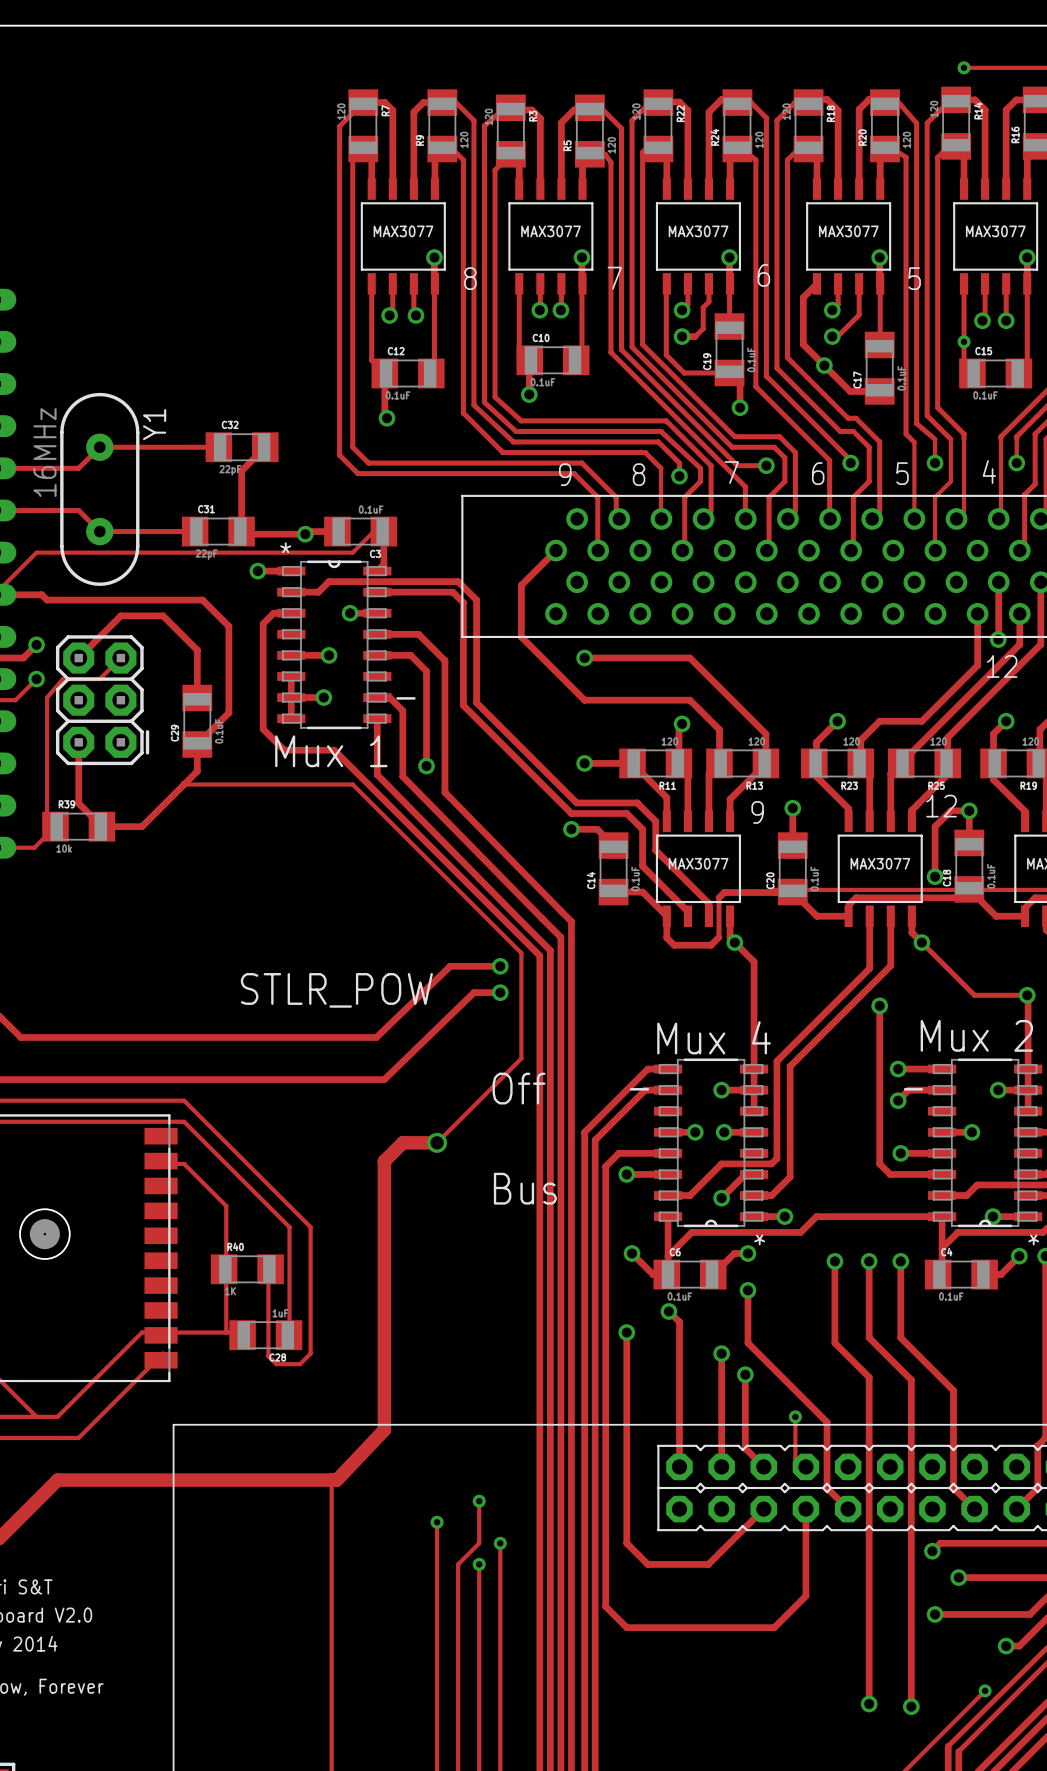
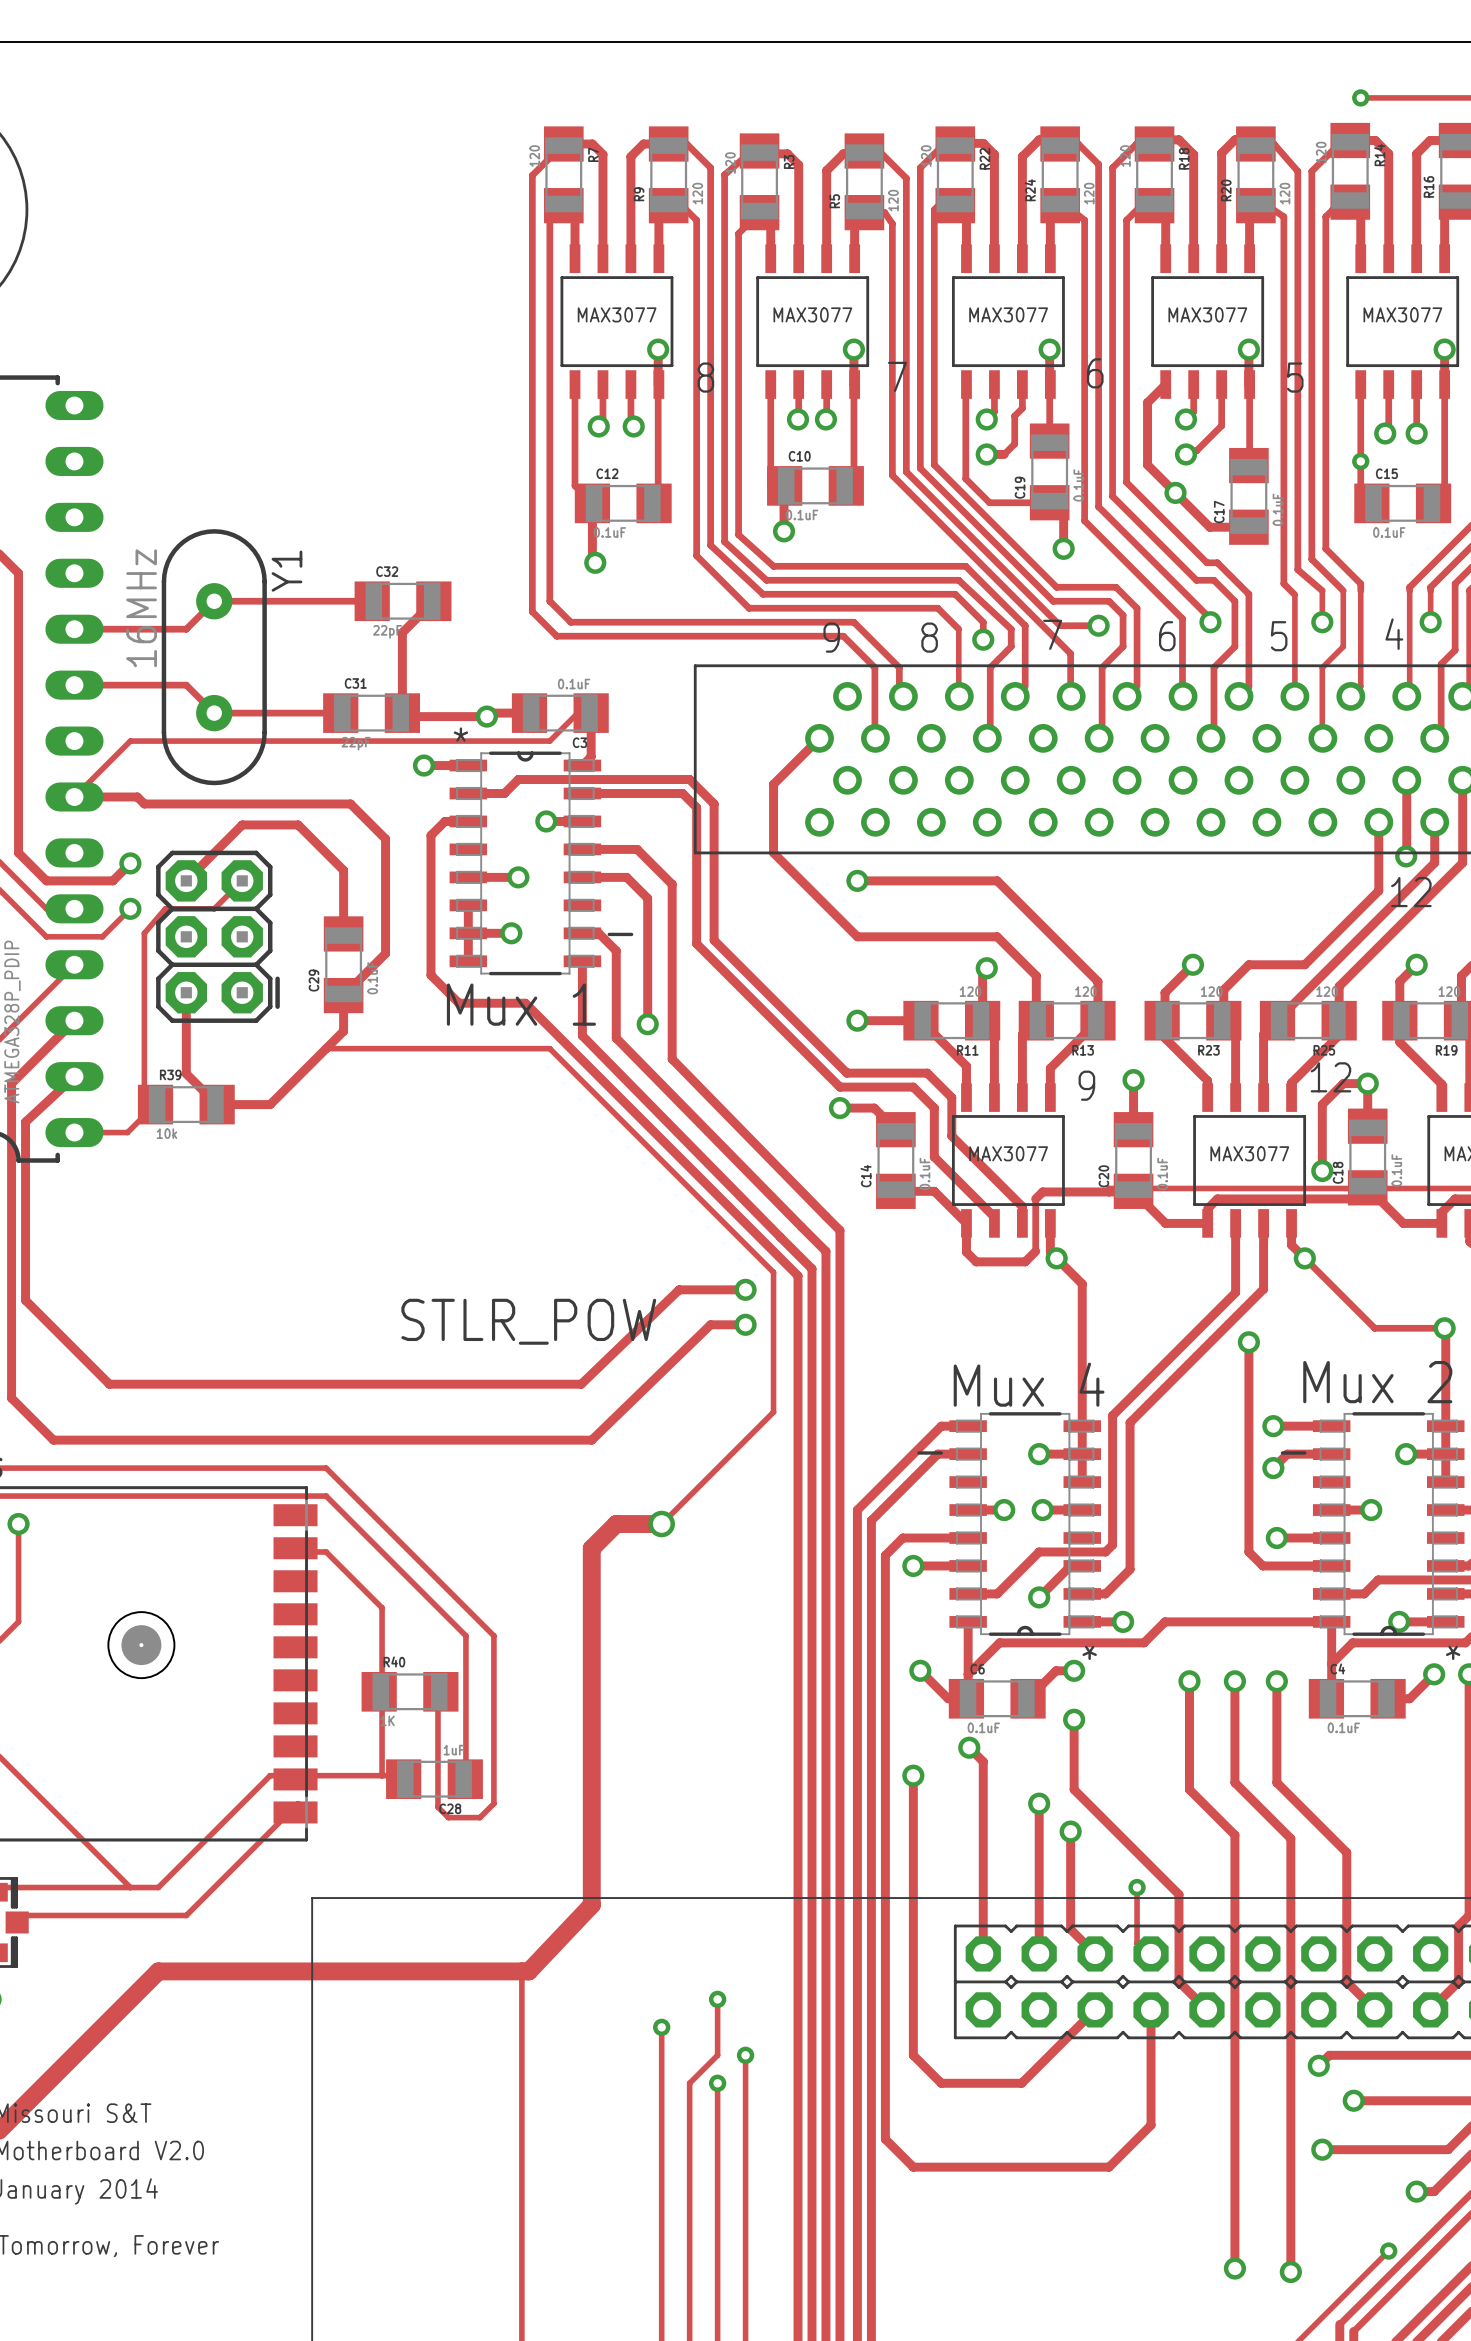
text: Off (519, 1088) -> none
text: Bus (525, 1188) -> none

